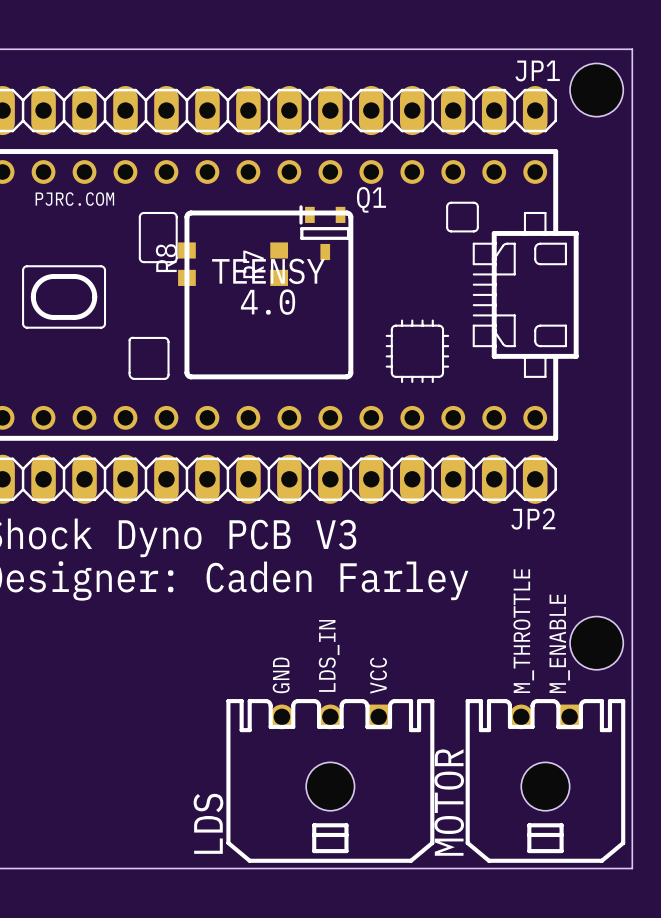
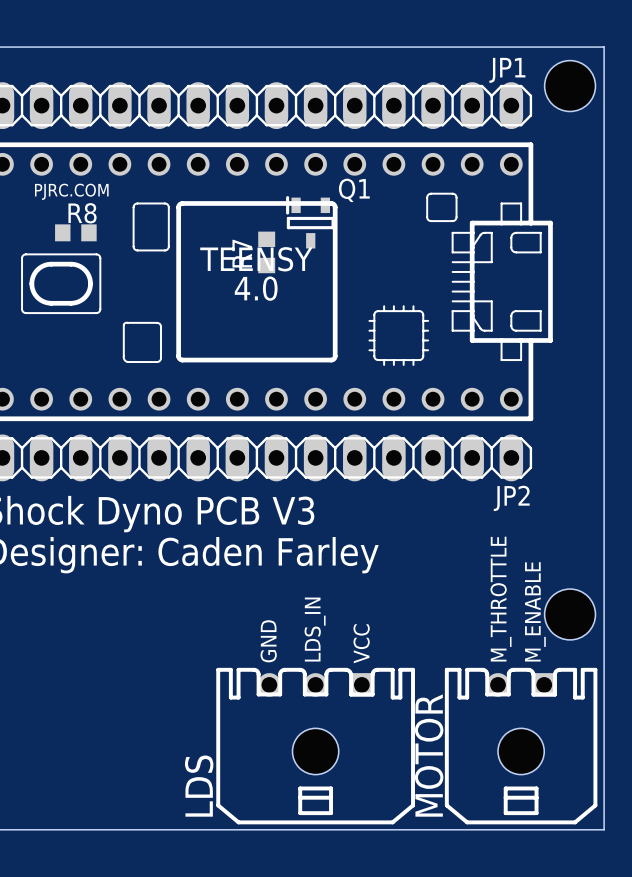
R8 rotation: 0° (186, 264) -> 90° clockwise (75, 232)
R8 position: (186, 264) -> (75, 232)

